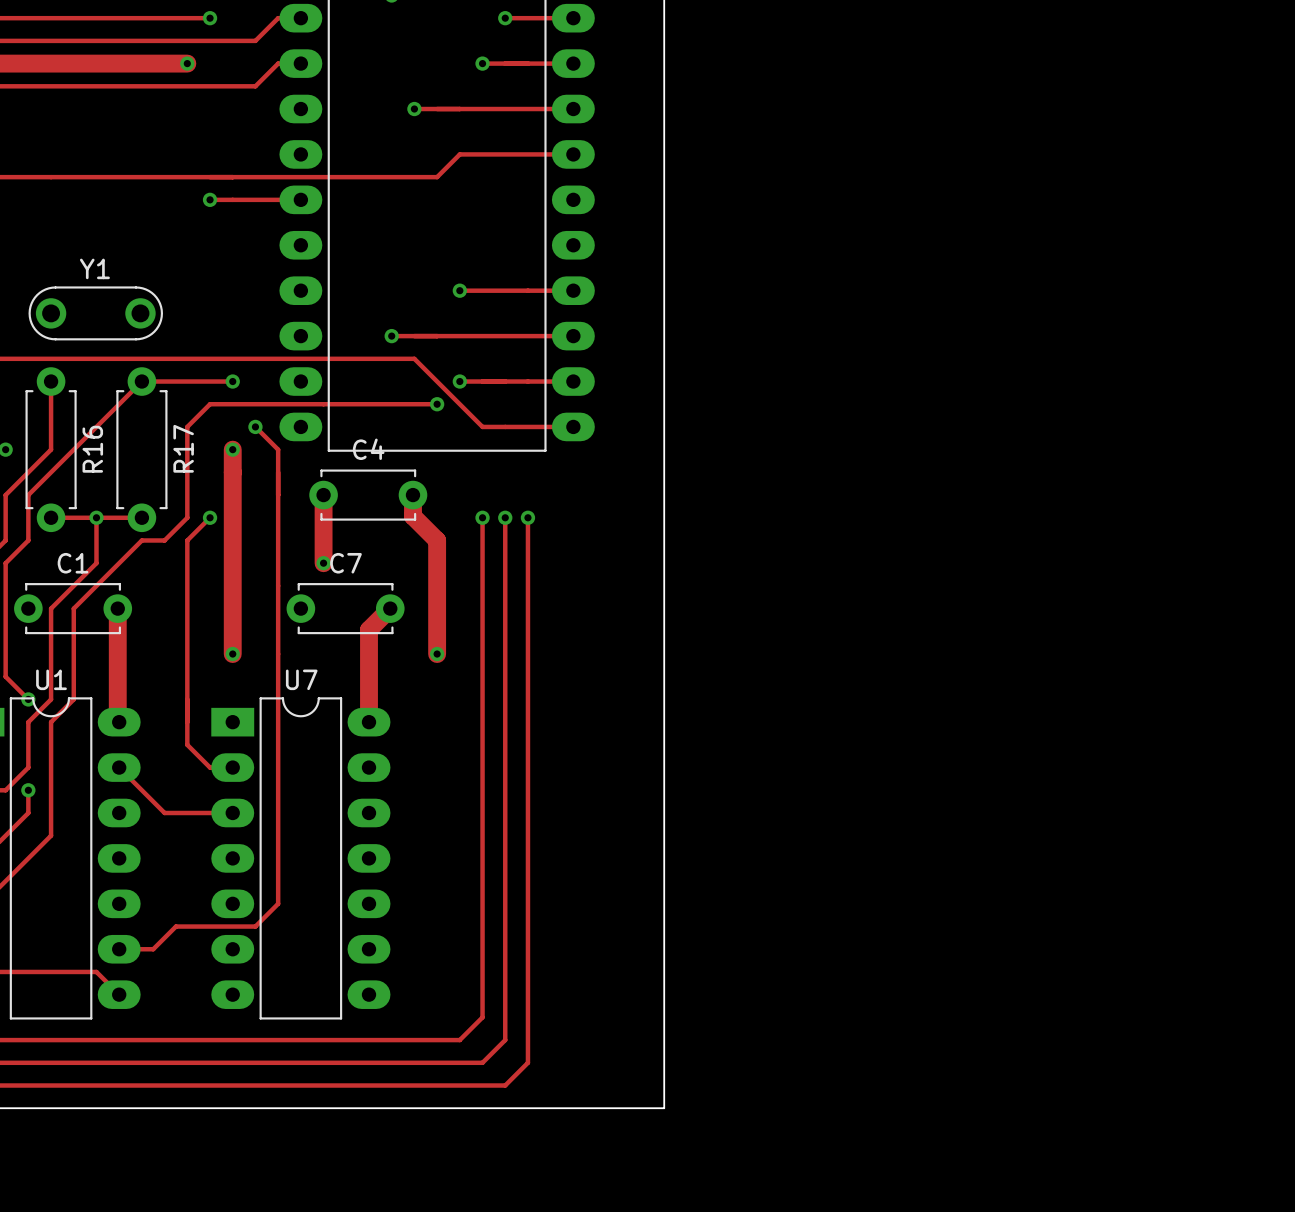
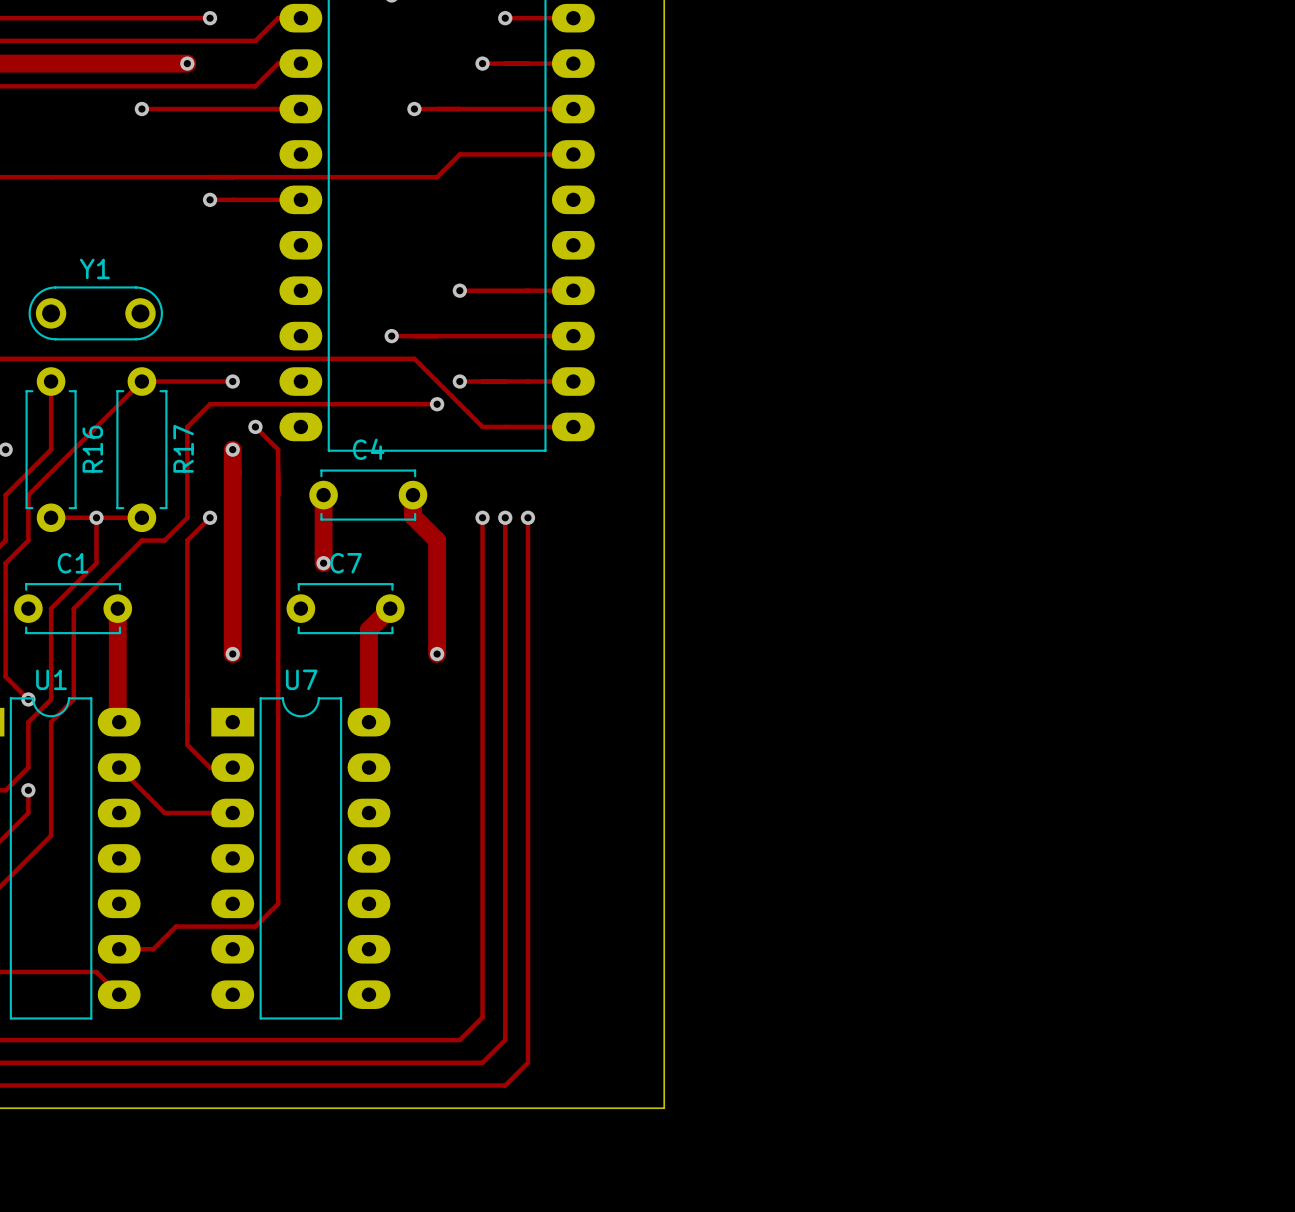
track: none -> (141, 109) (300, 109)
via: none -> (141, 109)

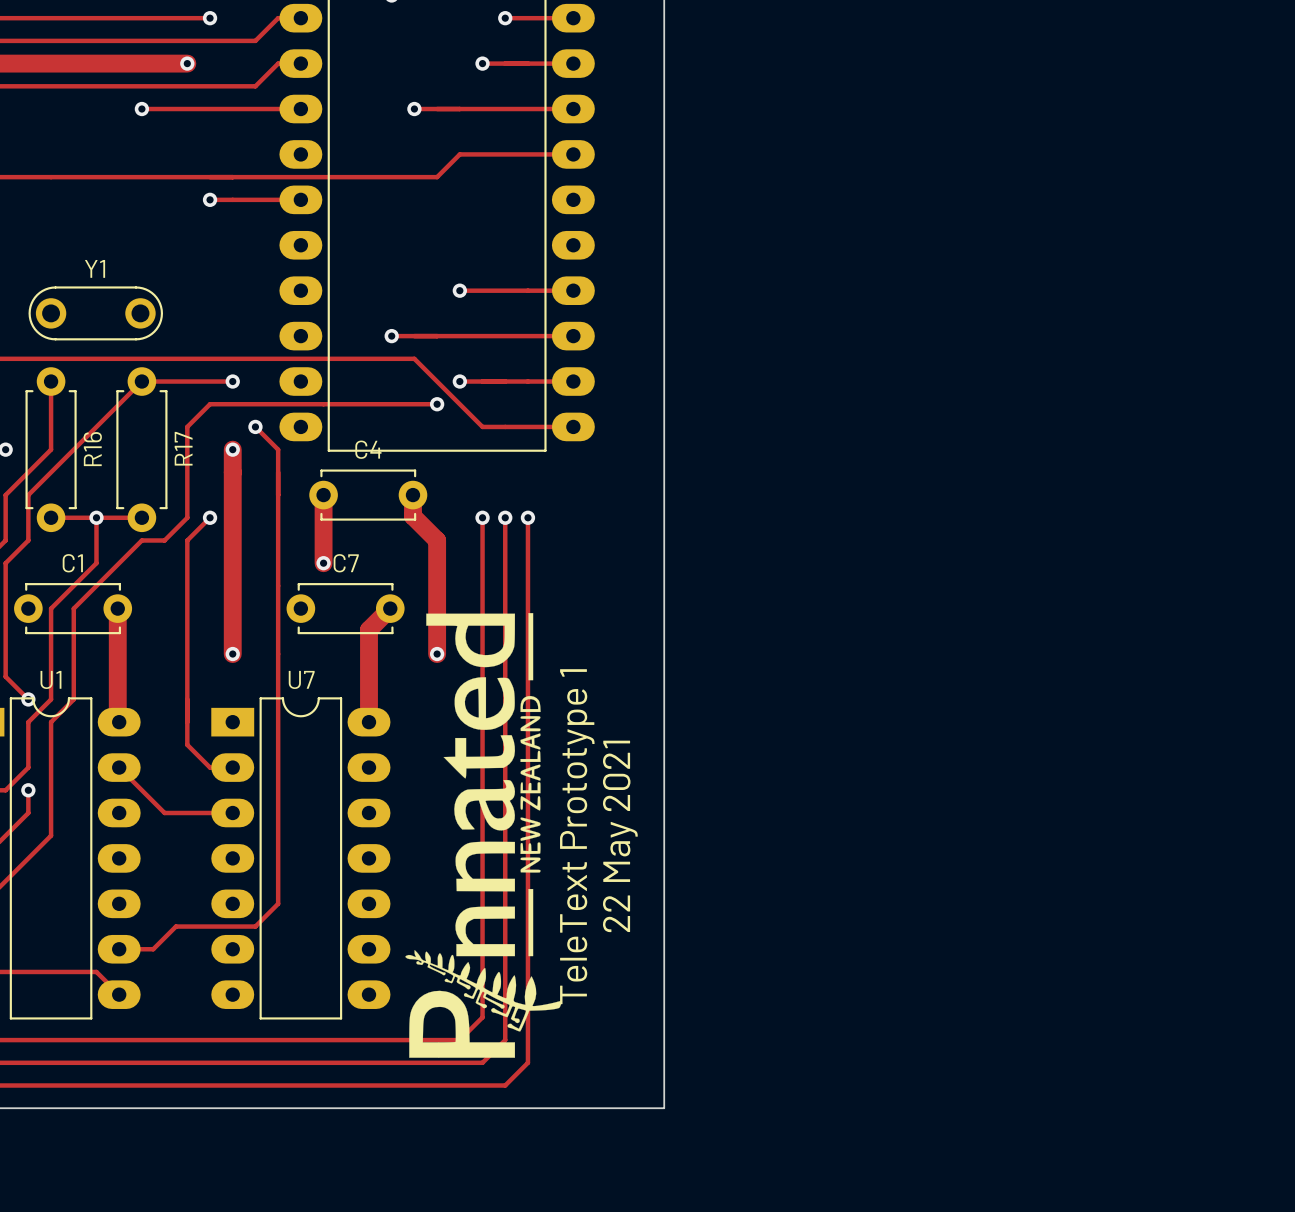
drawing: none -> [405, 613, 563, 1058]
text: none -> TeleText Prototype 1 (577, 836)
text: none -> 22 May 2021 (620, 836)

